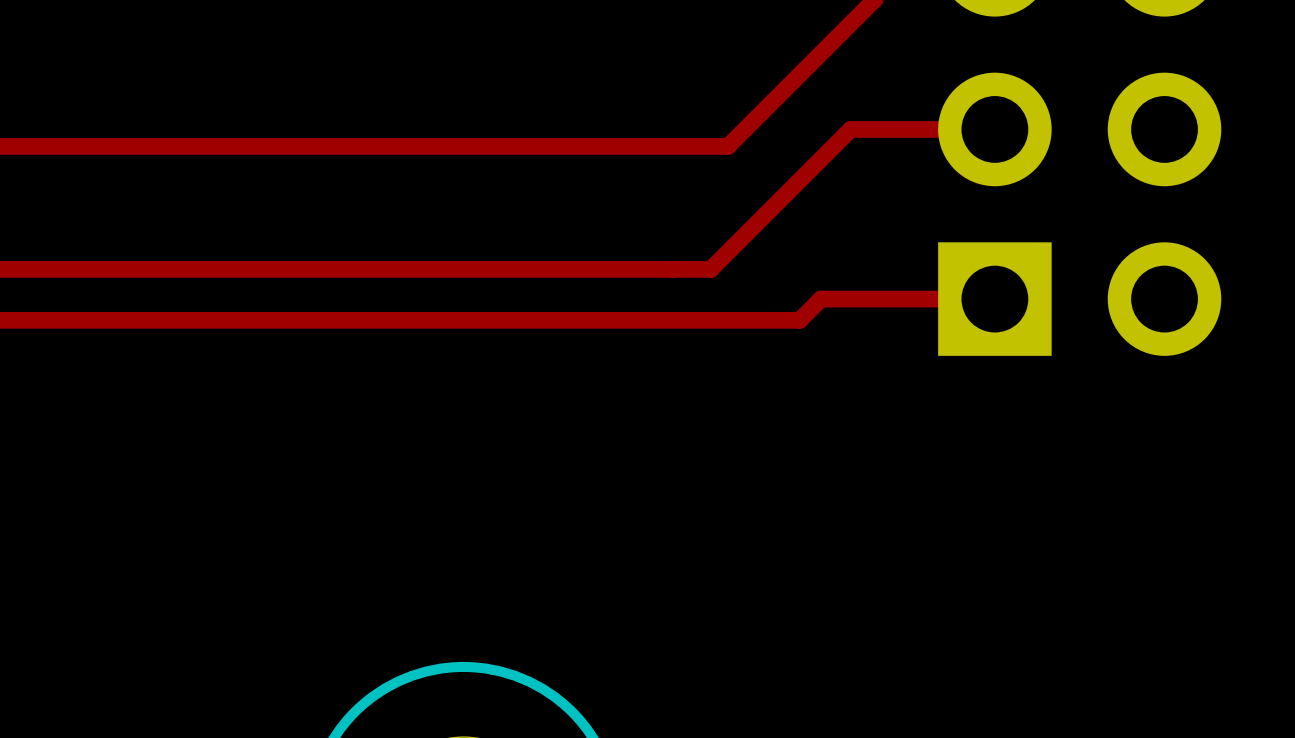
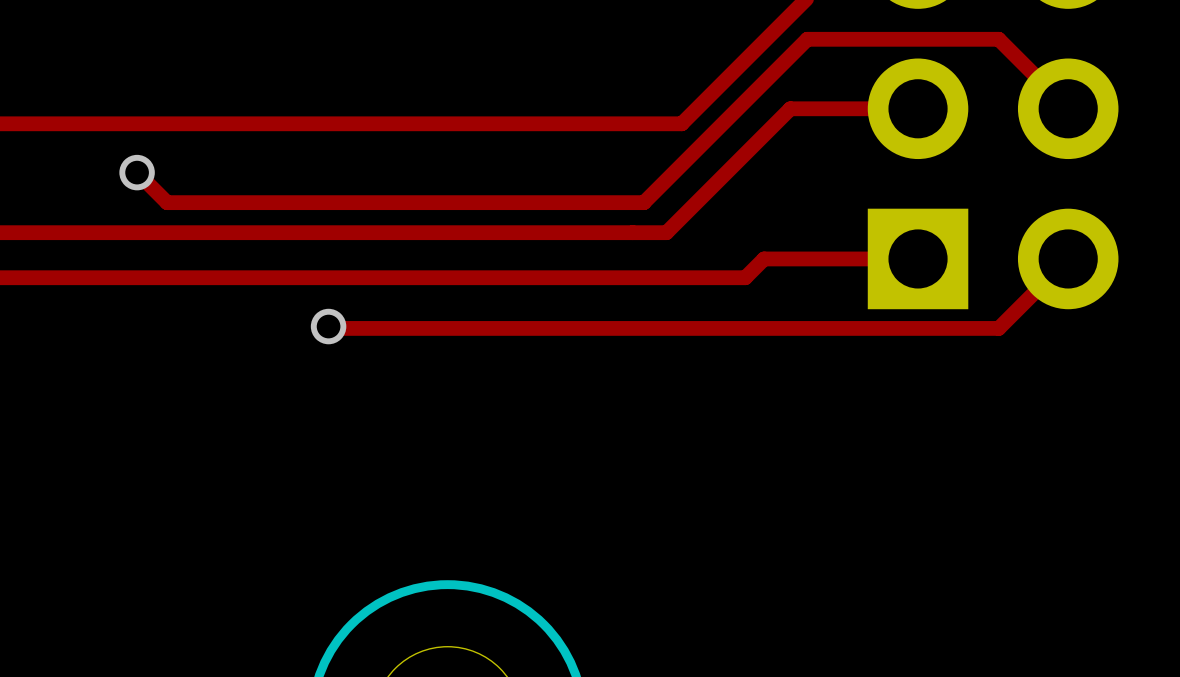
track: none -> (1068, 108) (998, 39) (807, 39) (643, 202) (167, 202) (137, 172)
via: none -> (137, 172)
track: none -> (1068, 258) (998, 328) (330, 328) (328, 326)
via: none -> (328, 326)

